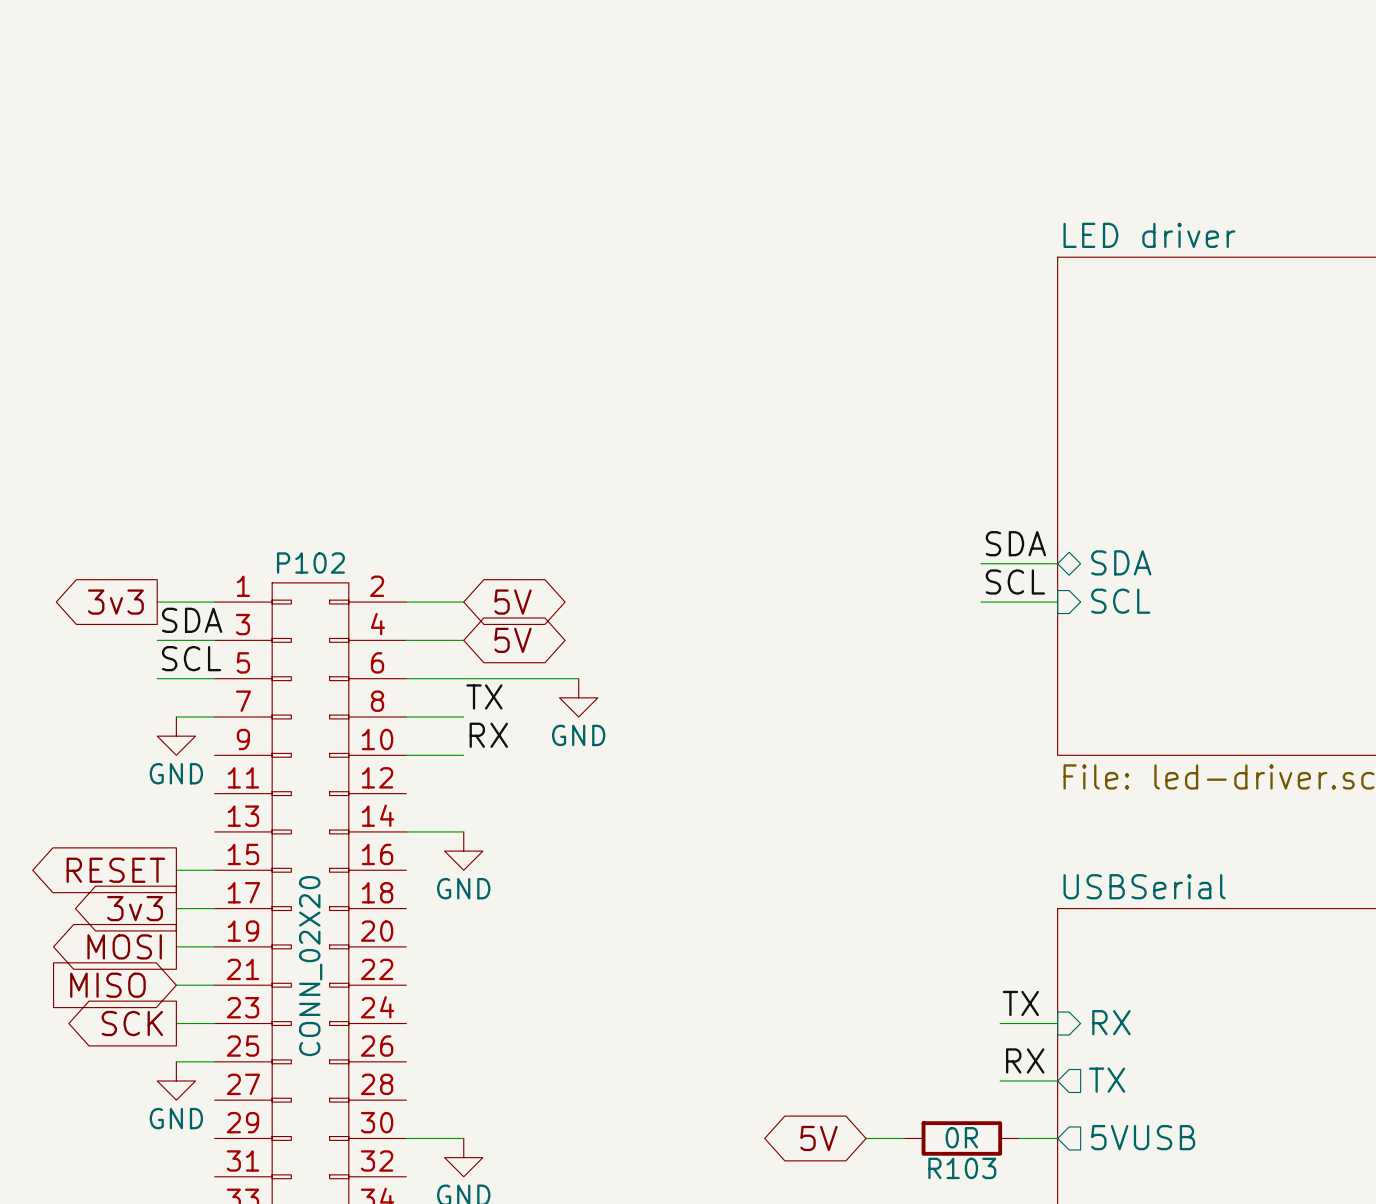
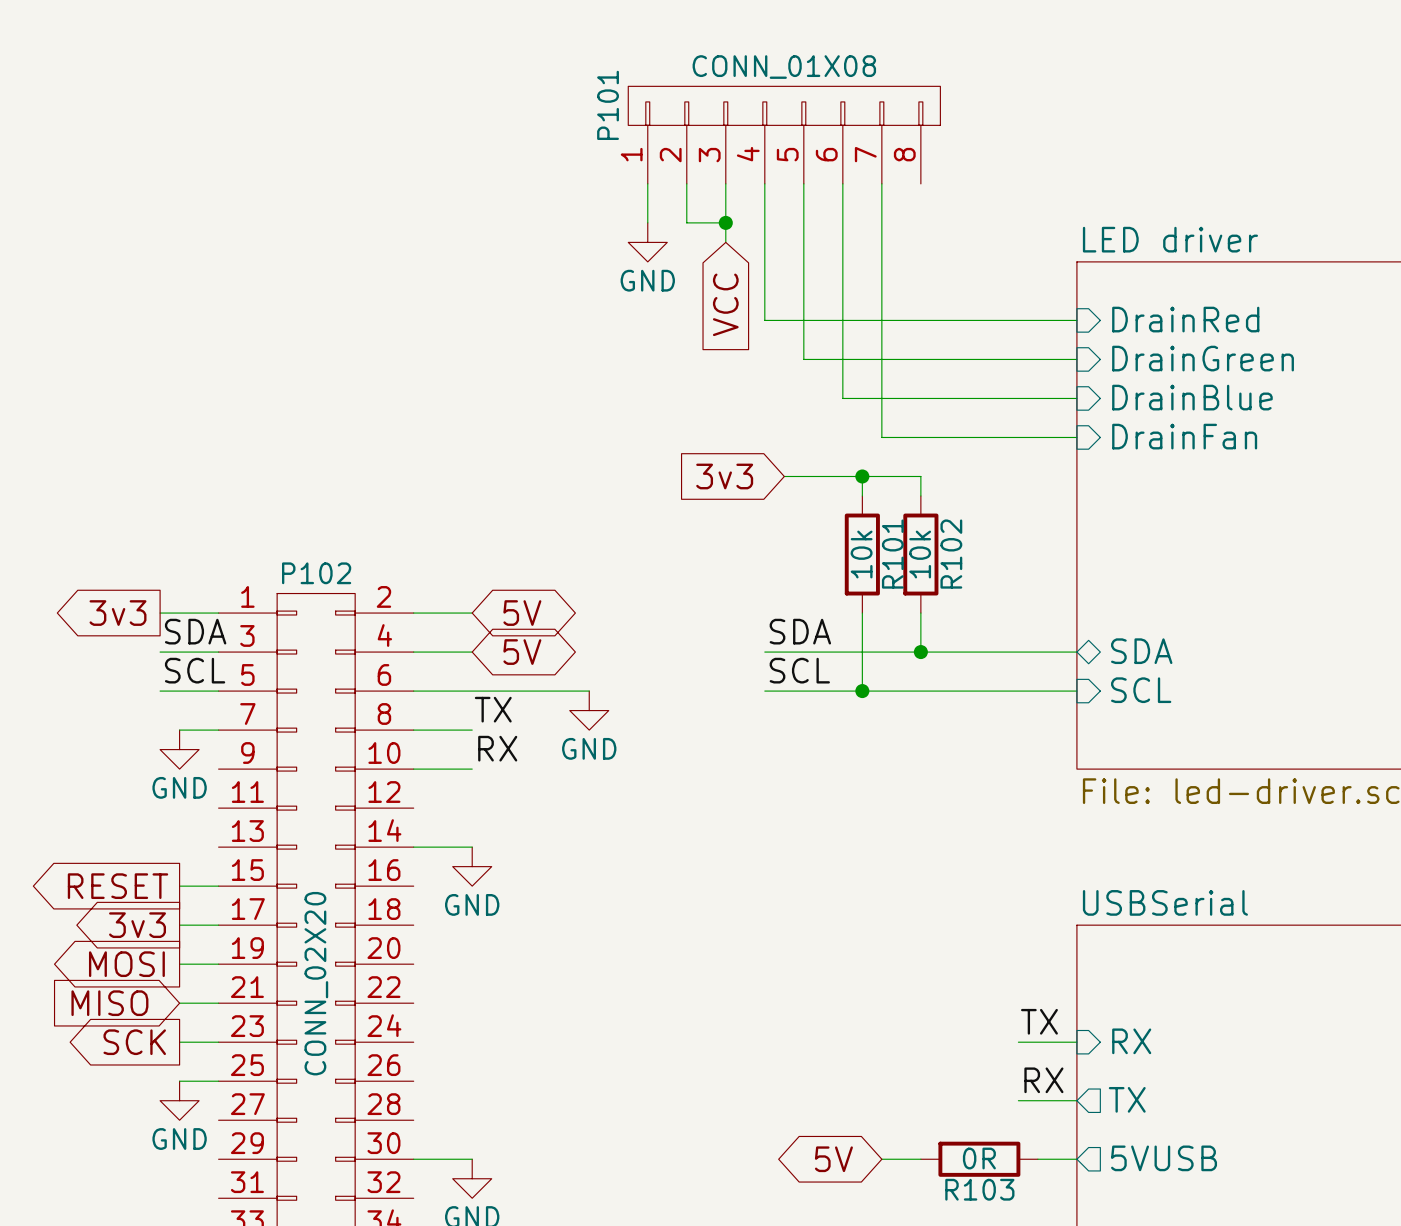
P101: none -> CONN_01X08 (784, 135)
wire: none -> (647, 183) (647, 222)
wire: none -> (686, 183) (686, 222) (725, 222)
wire: none -> (725, 183) (725, 242)
wire: none -> (764, 183) (764, 320) (1076, 320)
wire: none -> (803, 183) (803, 359) (1076, 359)
wire: none -> (842, 183) (842, 398) (1076, 398)
wire: none -> (881, 183) (881, 437) (1076, 437)
junction: none -> (725, 222)
power symbol: none -> GND (647, 242)
global label: none -> VCC (725, 304)
sheet pin: none -> DrainRed (1185, 319)
sheet pin: none -> DrainGreen (1203, 358)
sheet pin: none -> DrainBlue (1192, 397)
sheet pin: none -> DrainFan (1184, 436)
global label: none -> 3v3 (724, 476)
wire: none -> (784, 476) (920, 476) (920, 495)
wire: none -> (862, 476) (862, 495)
junction: none -> (862, 476)
label position: SDA (1015, 543) -> SDA (800, 631)
R101: none -> 10k (862, 554)
R102: none -> 10k (920, 554)
sheet pin position: SDA (1121, 562) -> SDA (1141, 651)
wire: (981, 563) (1057, 563) -> none
label position: SCL (1015, 582) -> SCL (799, 670)
sheet pin position: SCL (1120, 601) -> SCL (1141, 690)
wire: none -> (862, 613) (862, 691)
wire: none -> (920, 613) (920, 652)
wire: (981, 602) (1057, 602) -> none
wire: none -> (764, 652) (1076, 652)
junction: none -> (920, 652)
wire: none -> (764, 691) (1076, 691)
junction: none -> (862, 691)

